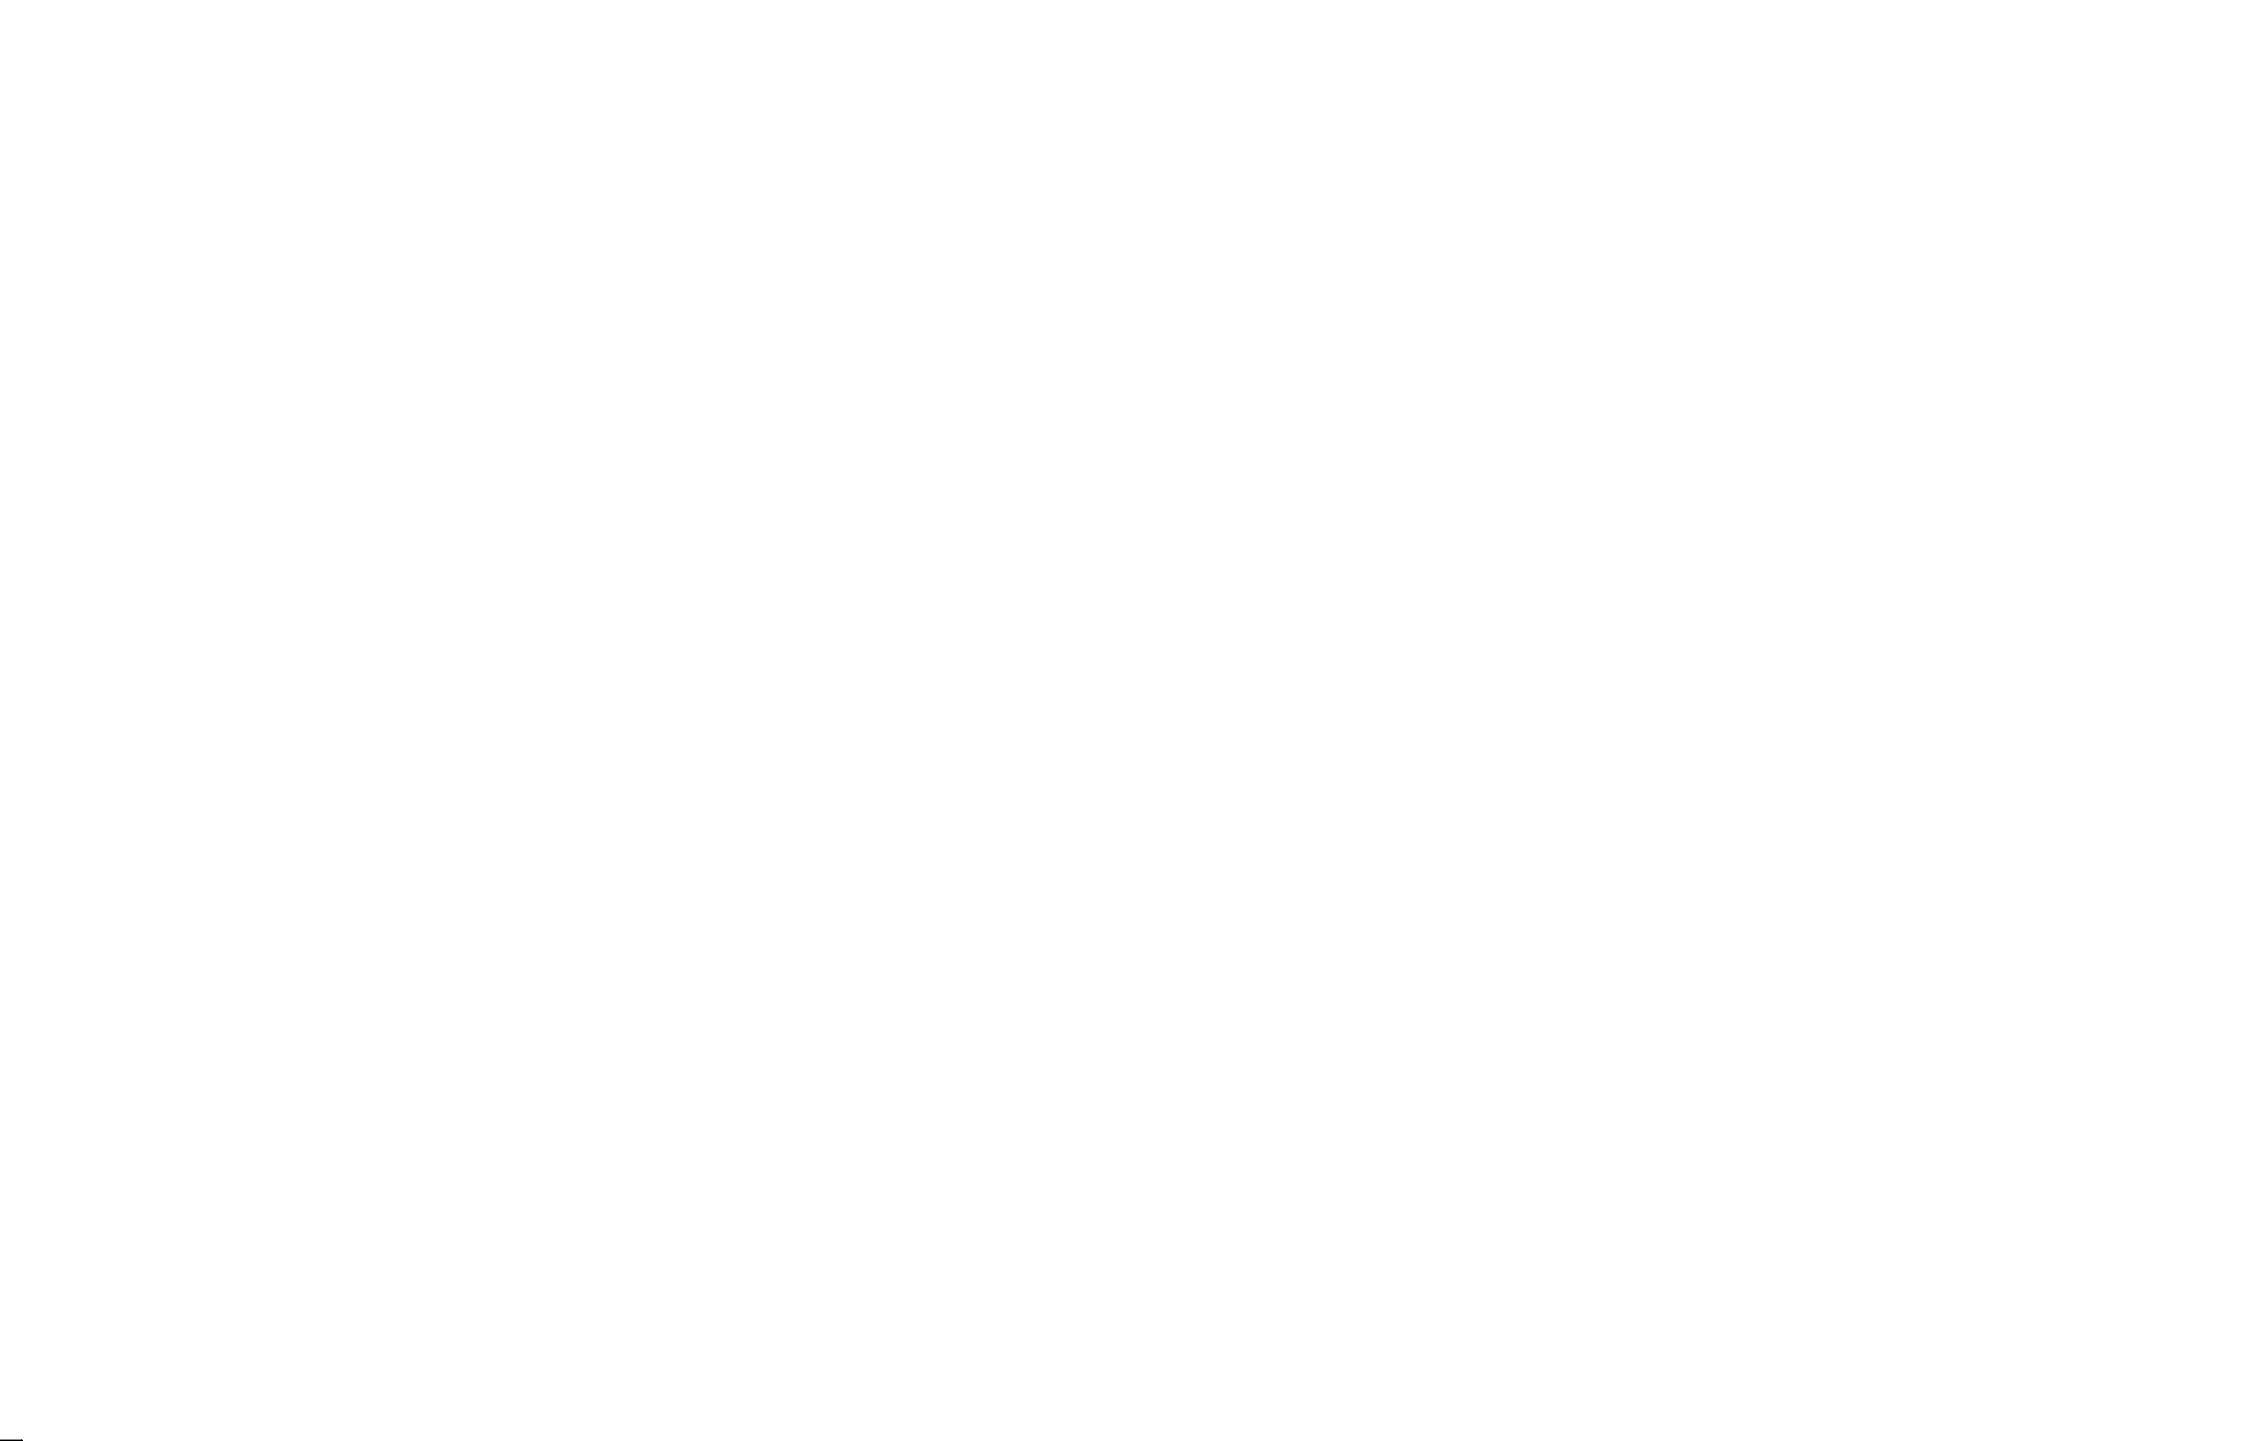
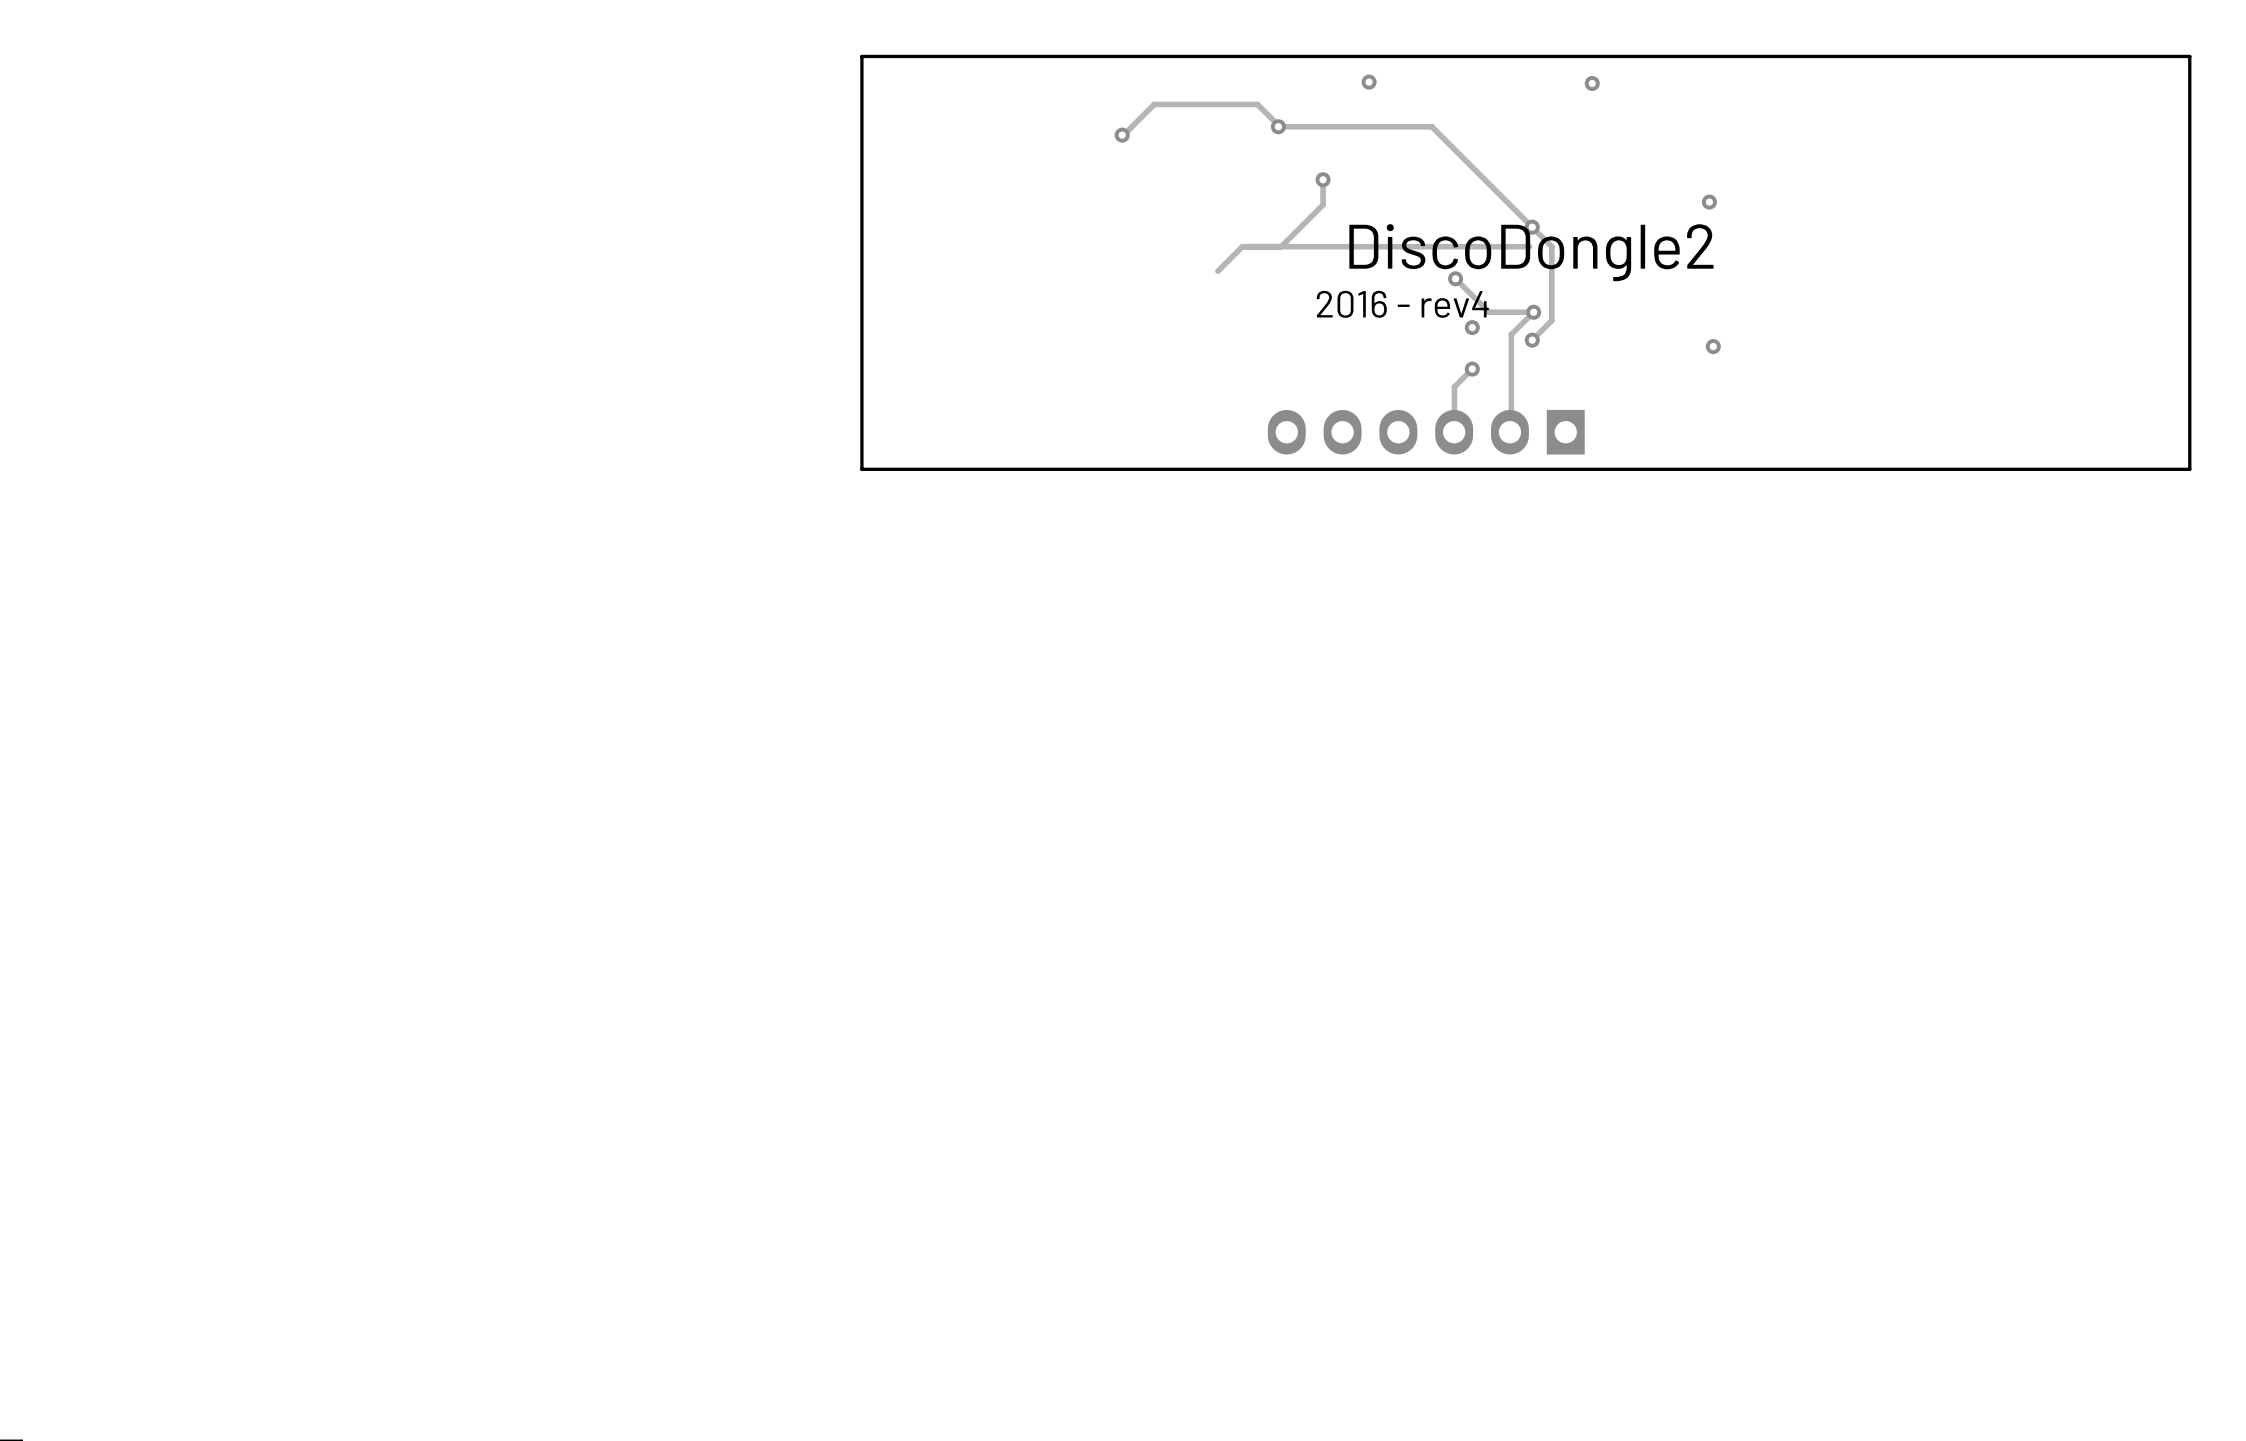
board edge: none -> (2189, 56) (2189, 469) (861, 469) (861, 56) (2189, 56)
via: none -> (1369, 82)
via: none -> (1592, 83)
via: none -> (1278, 126)
track: none -> (1122, 135) (1154, 104) (1257, 104) (1278, 126) (1431, 126) (1551, 246) (1551, 320) (1532, 340)
via: none -> (1122, 135)
track: none -> (1323, 179) (1323, 204) (1281, 246)
via: none -> (1323, 179)
via: none -> (1709, 202)
via: none -> (1532, 227)
track: none -> (1529, 246) (1242, 246) (1217, 271)
text: none -> DiscoDongle2 (1531, 252)
track: none -> (1455, 278) (1489, 312) (1533, 312) (1511, 334) (1510, 432)
via: none -> (1455, 278)
text: none -> 2016 - rev4 (1402, 304)
via: none -> (1533, 312)
via: none -> (1472, 327)
via: none -> (1532, 340)
via: none -> (1713, 346)
track: none -> (1472, 369) (1454, 386) (1454, 432)
via: none -> (1472, 369)
part: none -> (1426, 432)

